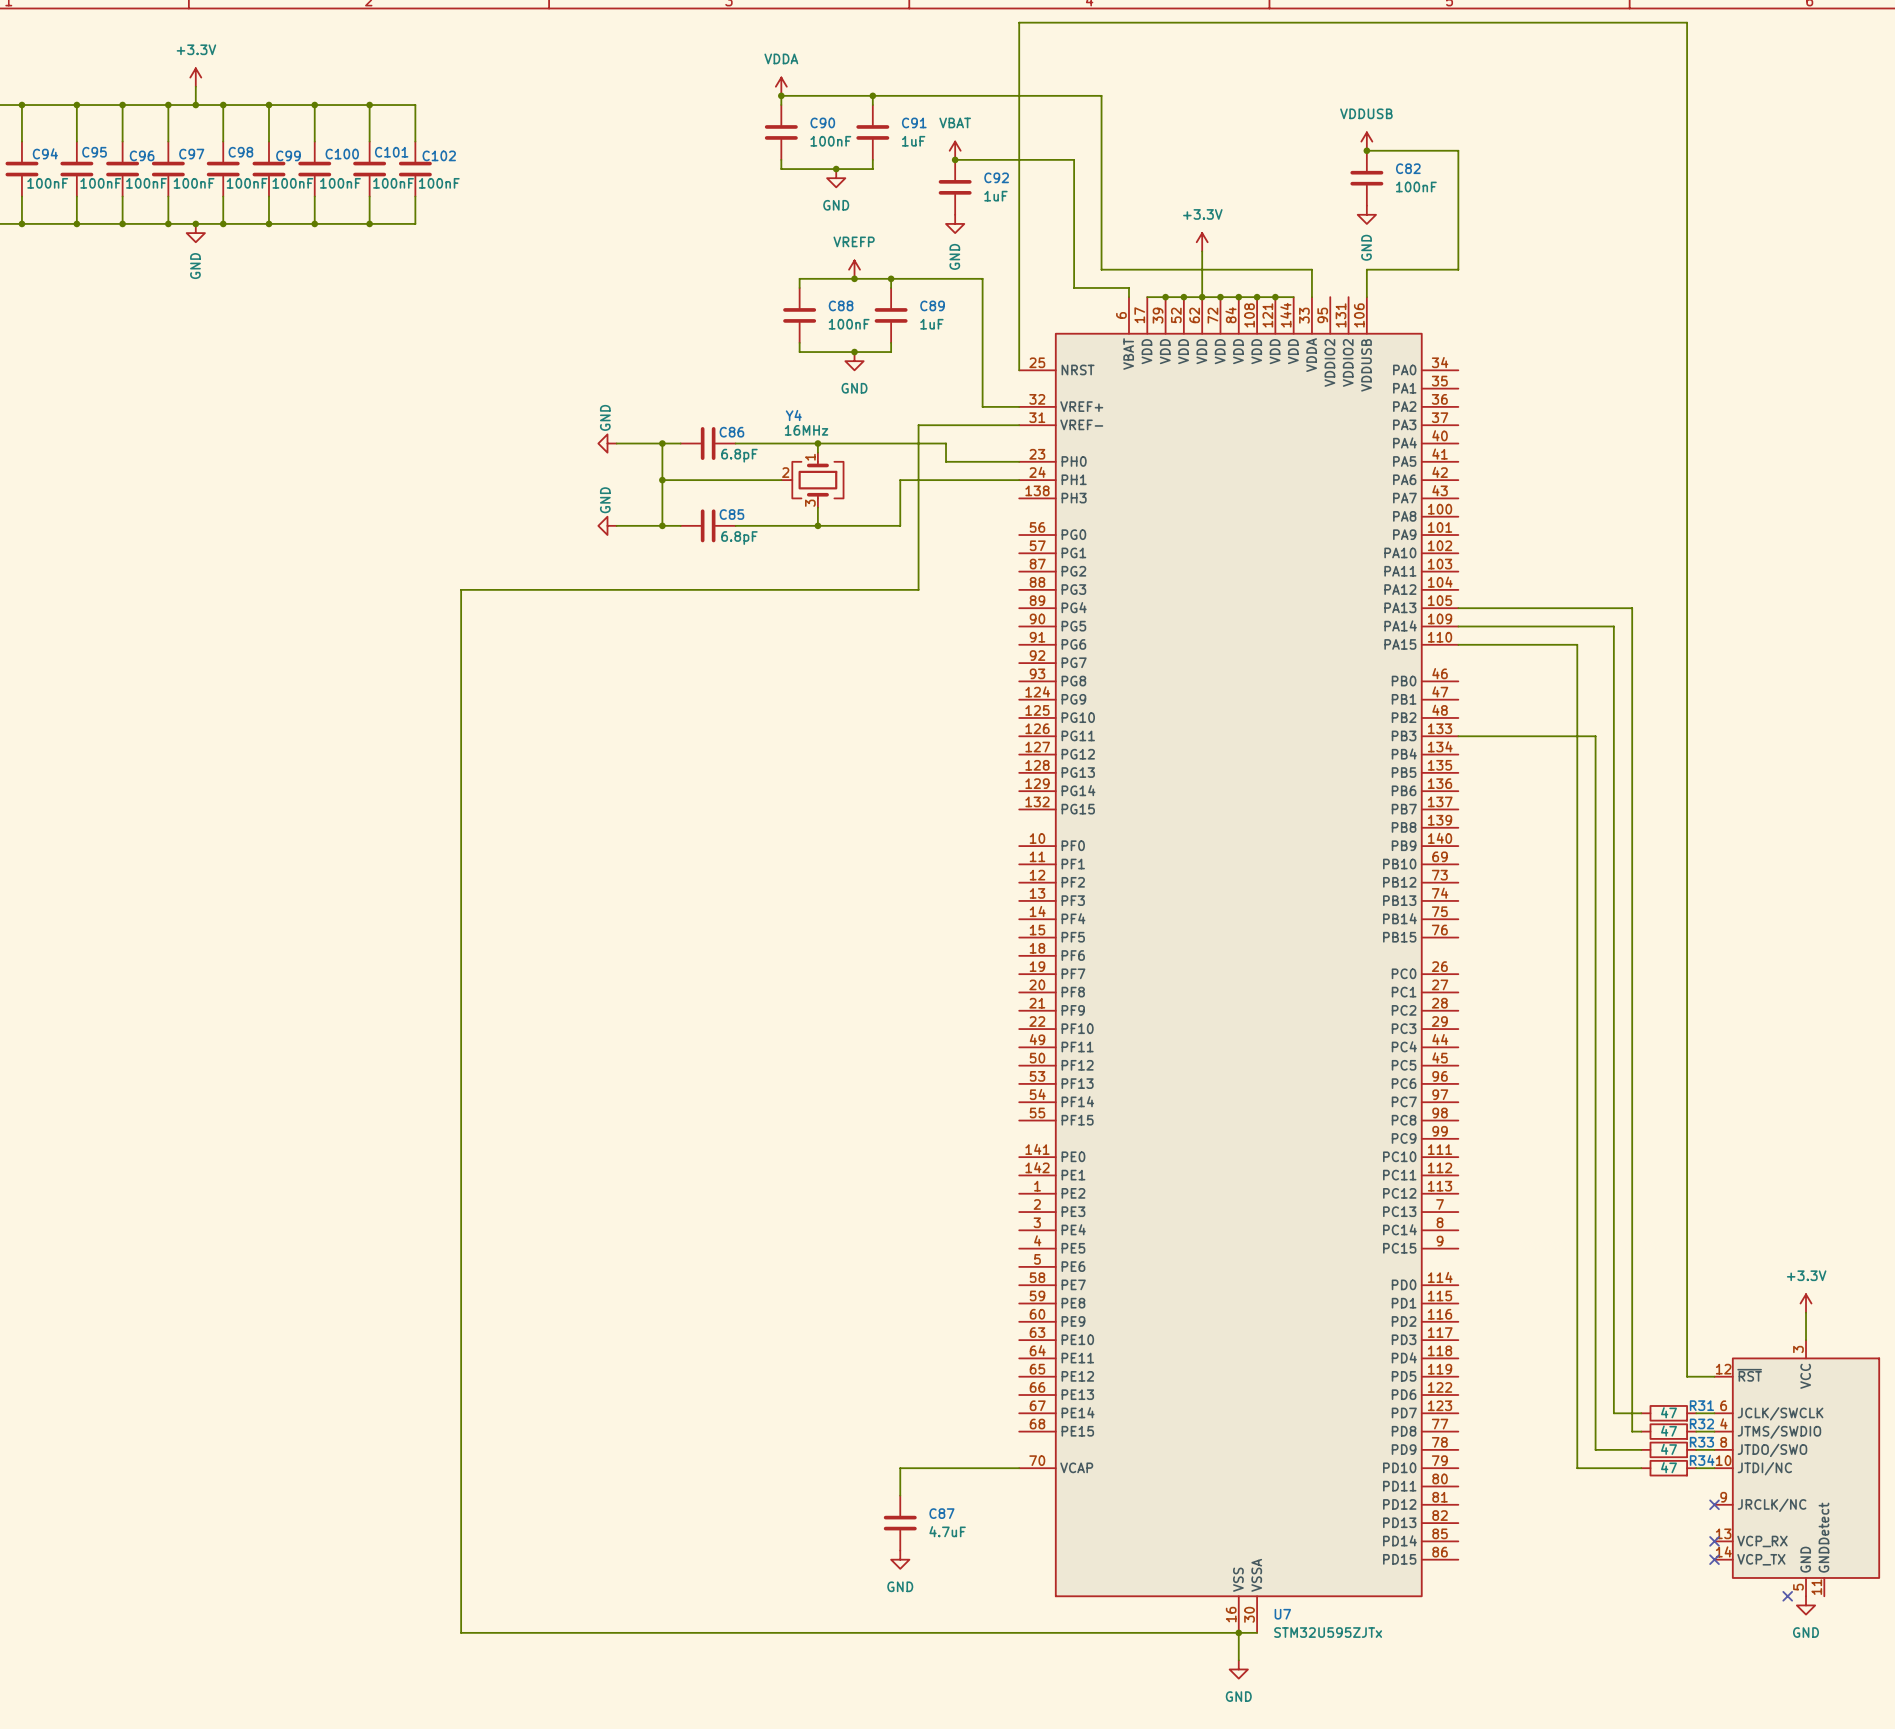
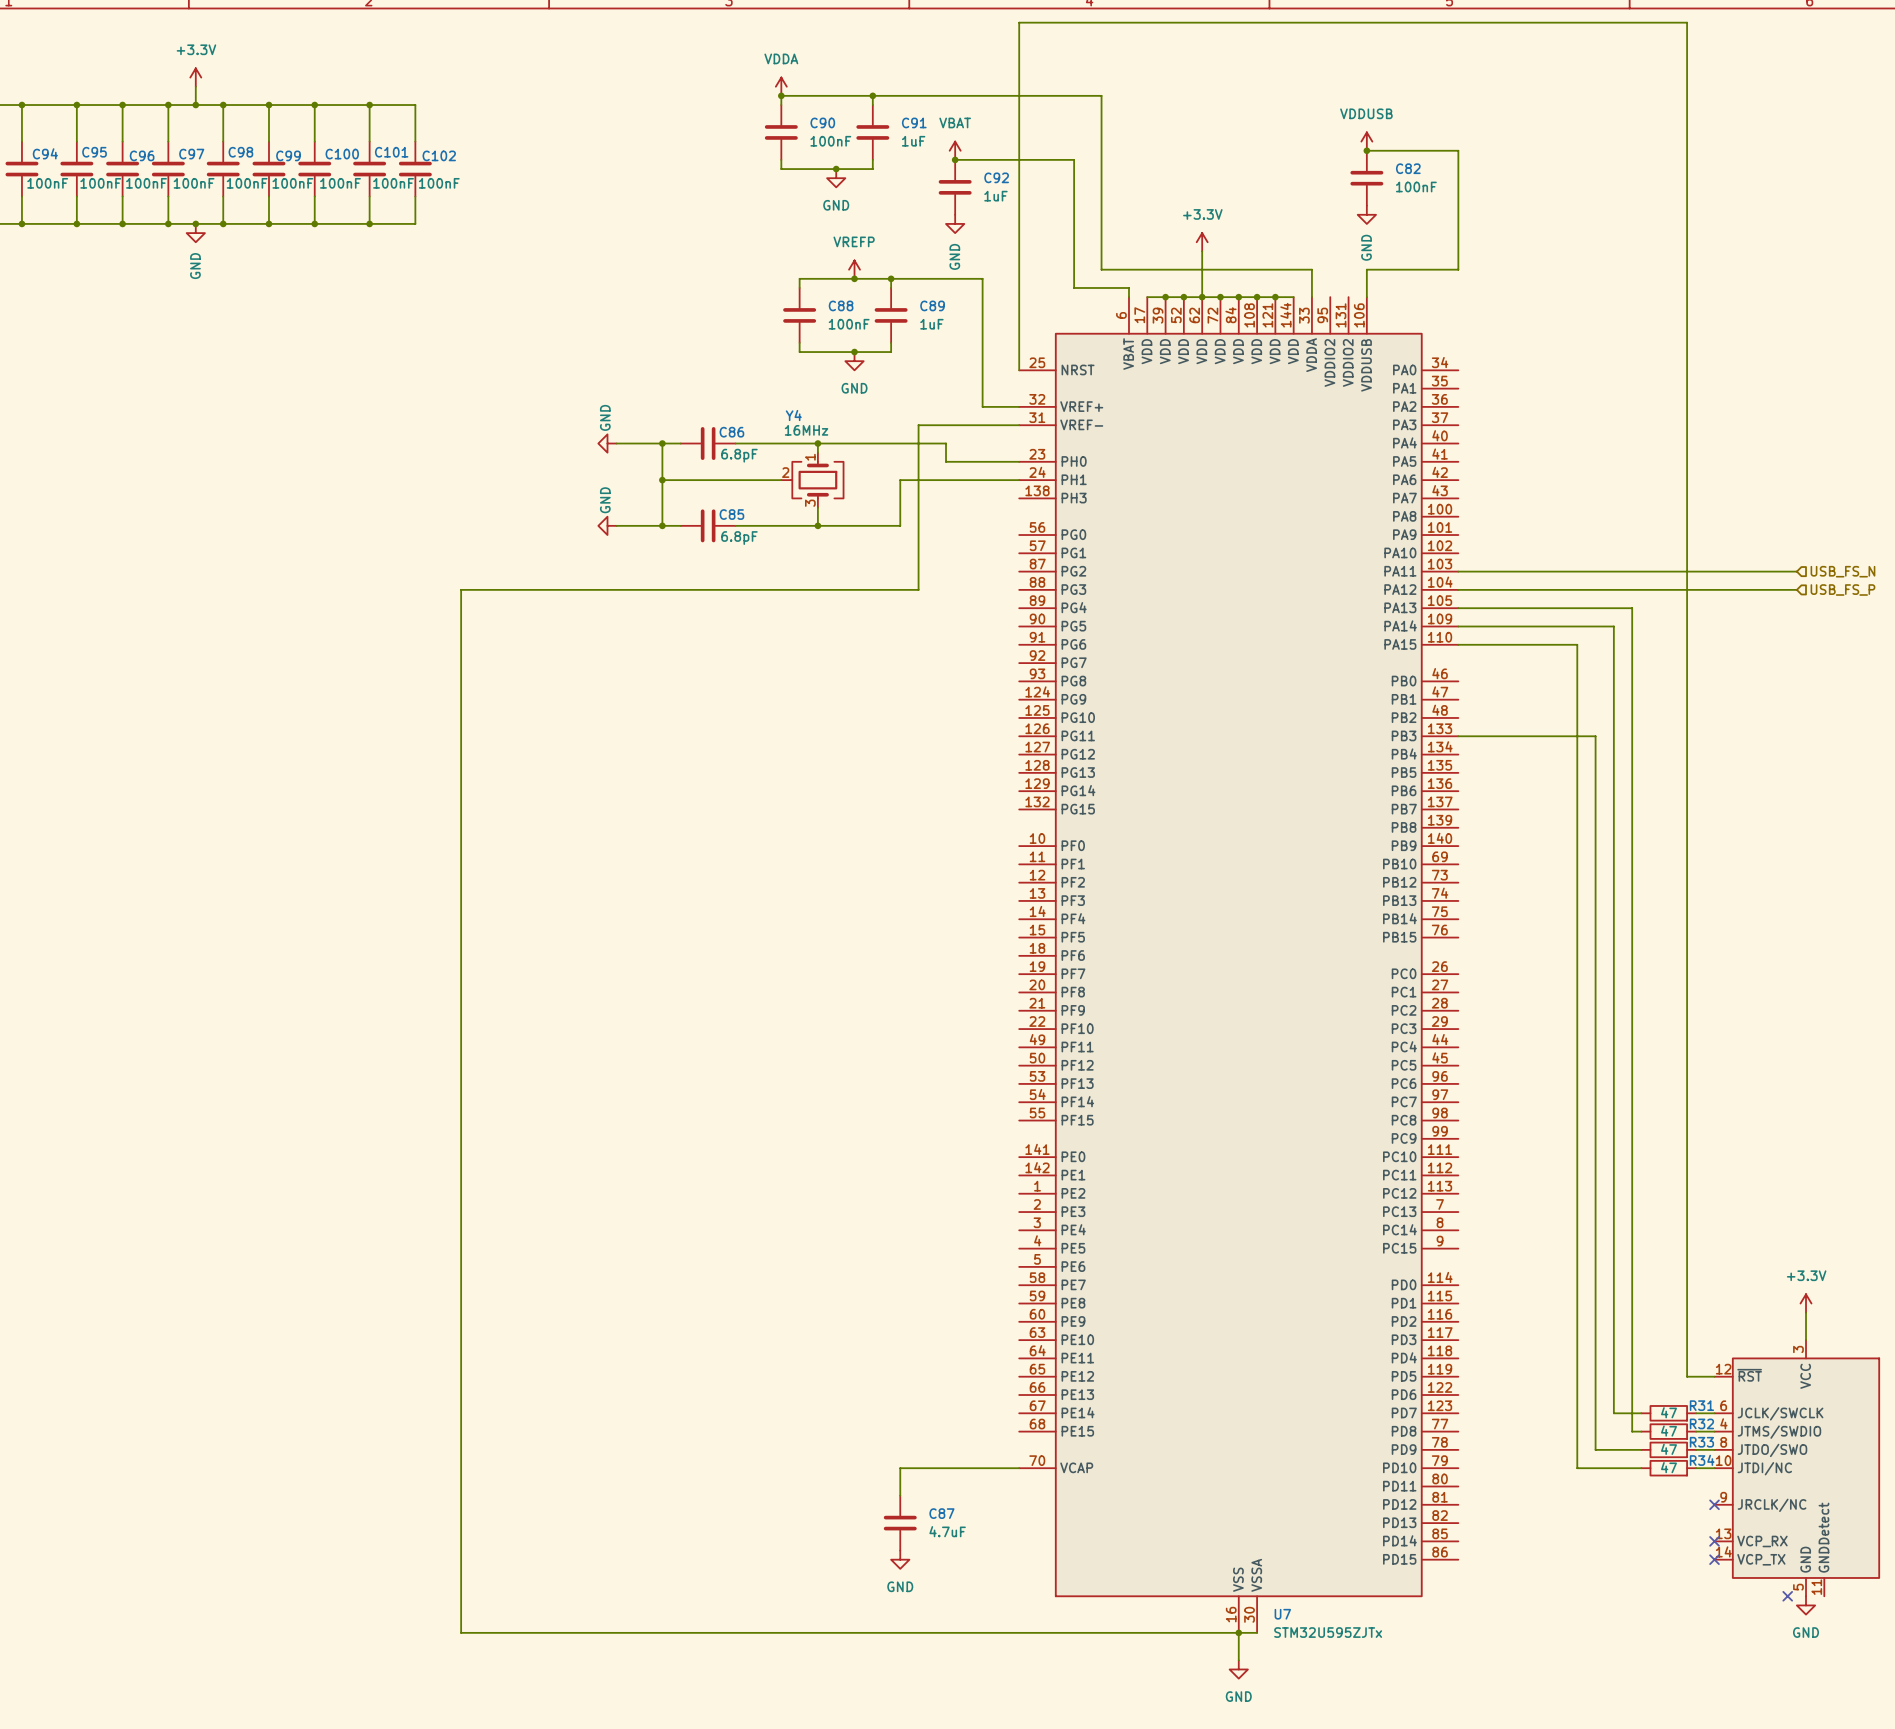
wire: none -> (1458, 571) (1796, 571)
hierarchical label: none -> USB_FS_N (1842, 571)
wire: none -> (1458, 589) (1796, 589)
hierarchical label: none -> USB_FS_P (1842, 589)

